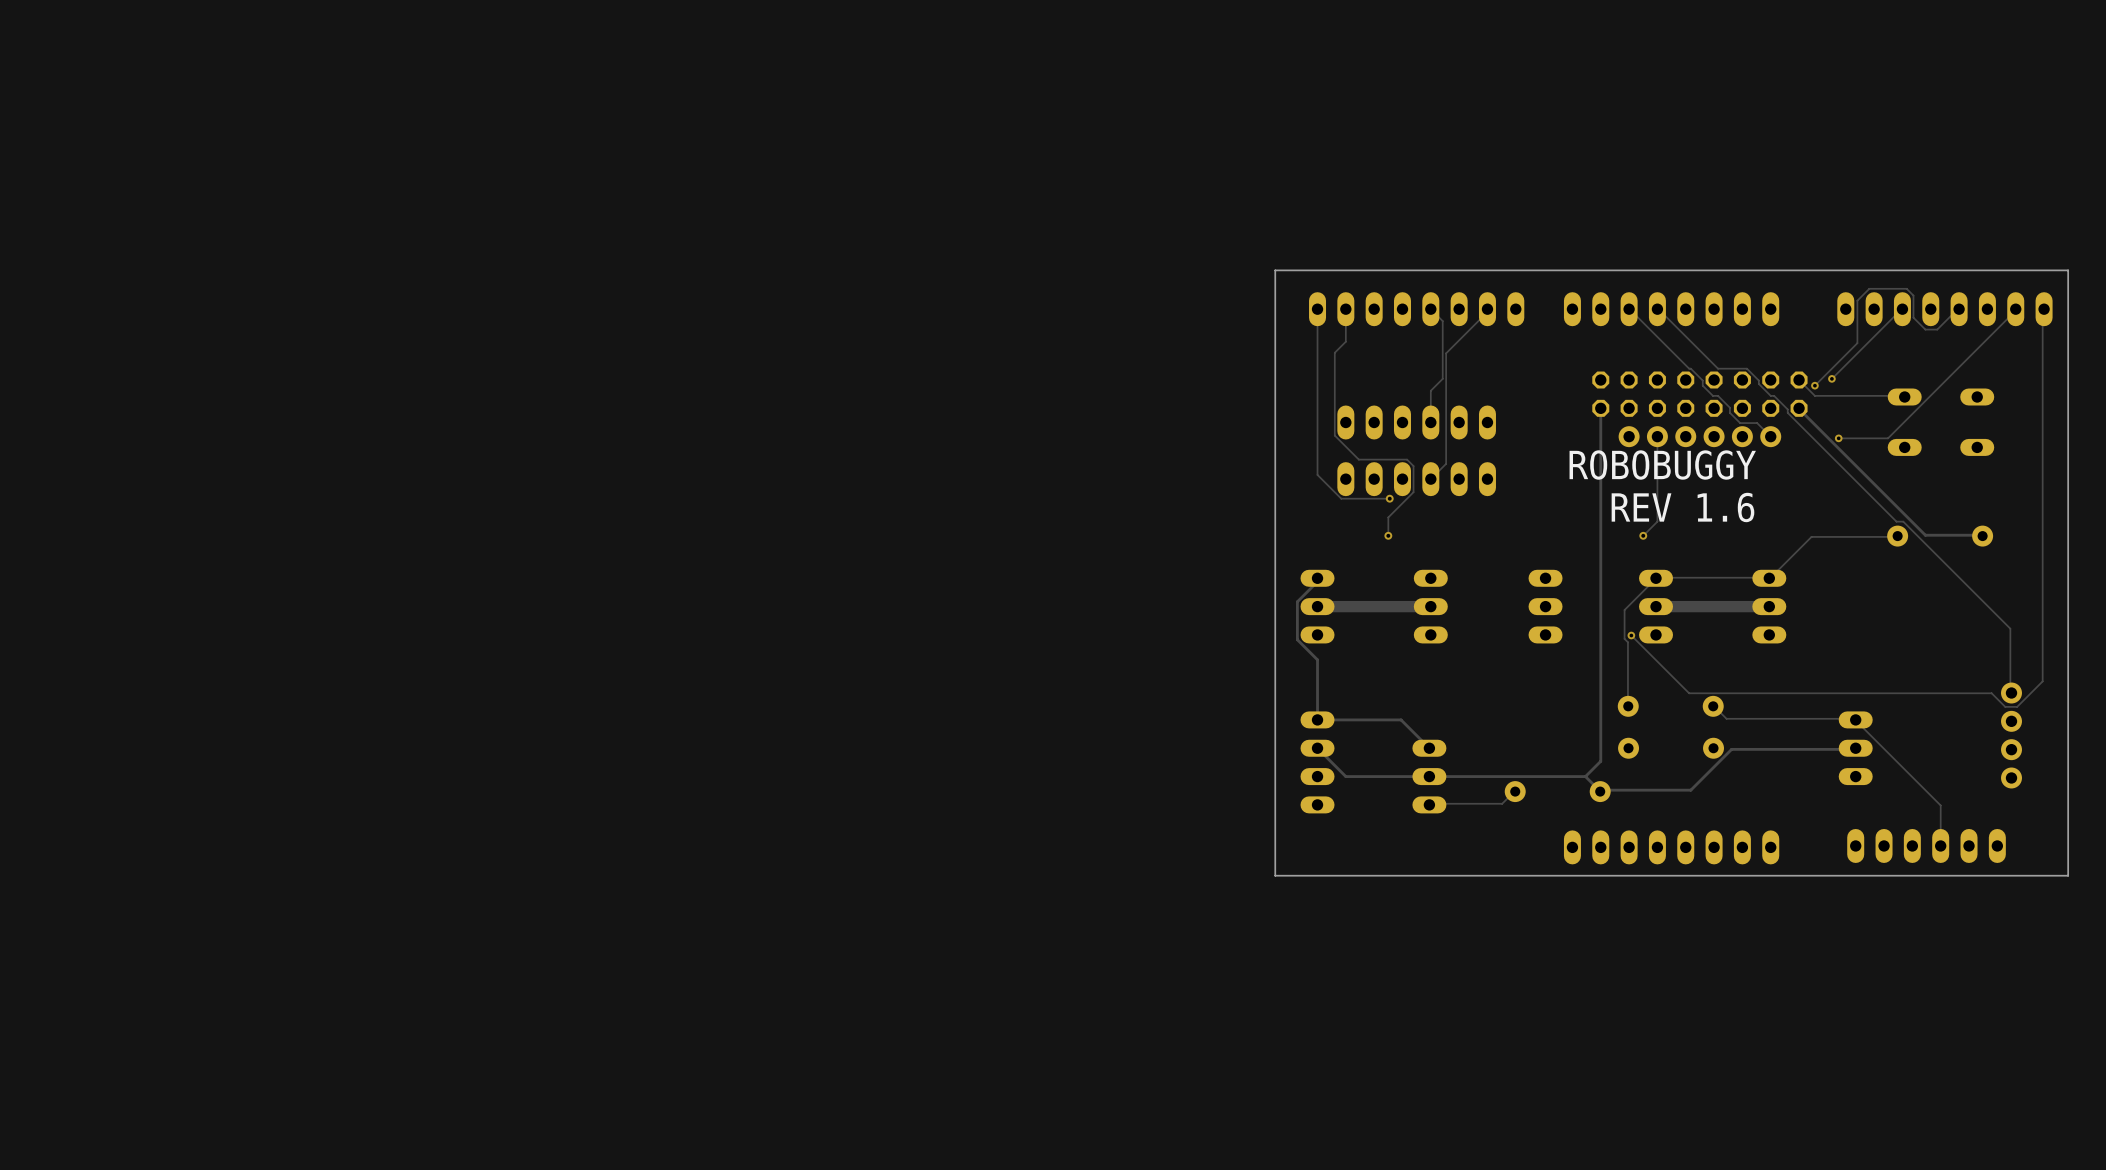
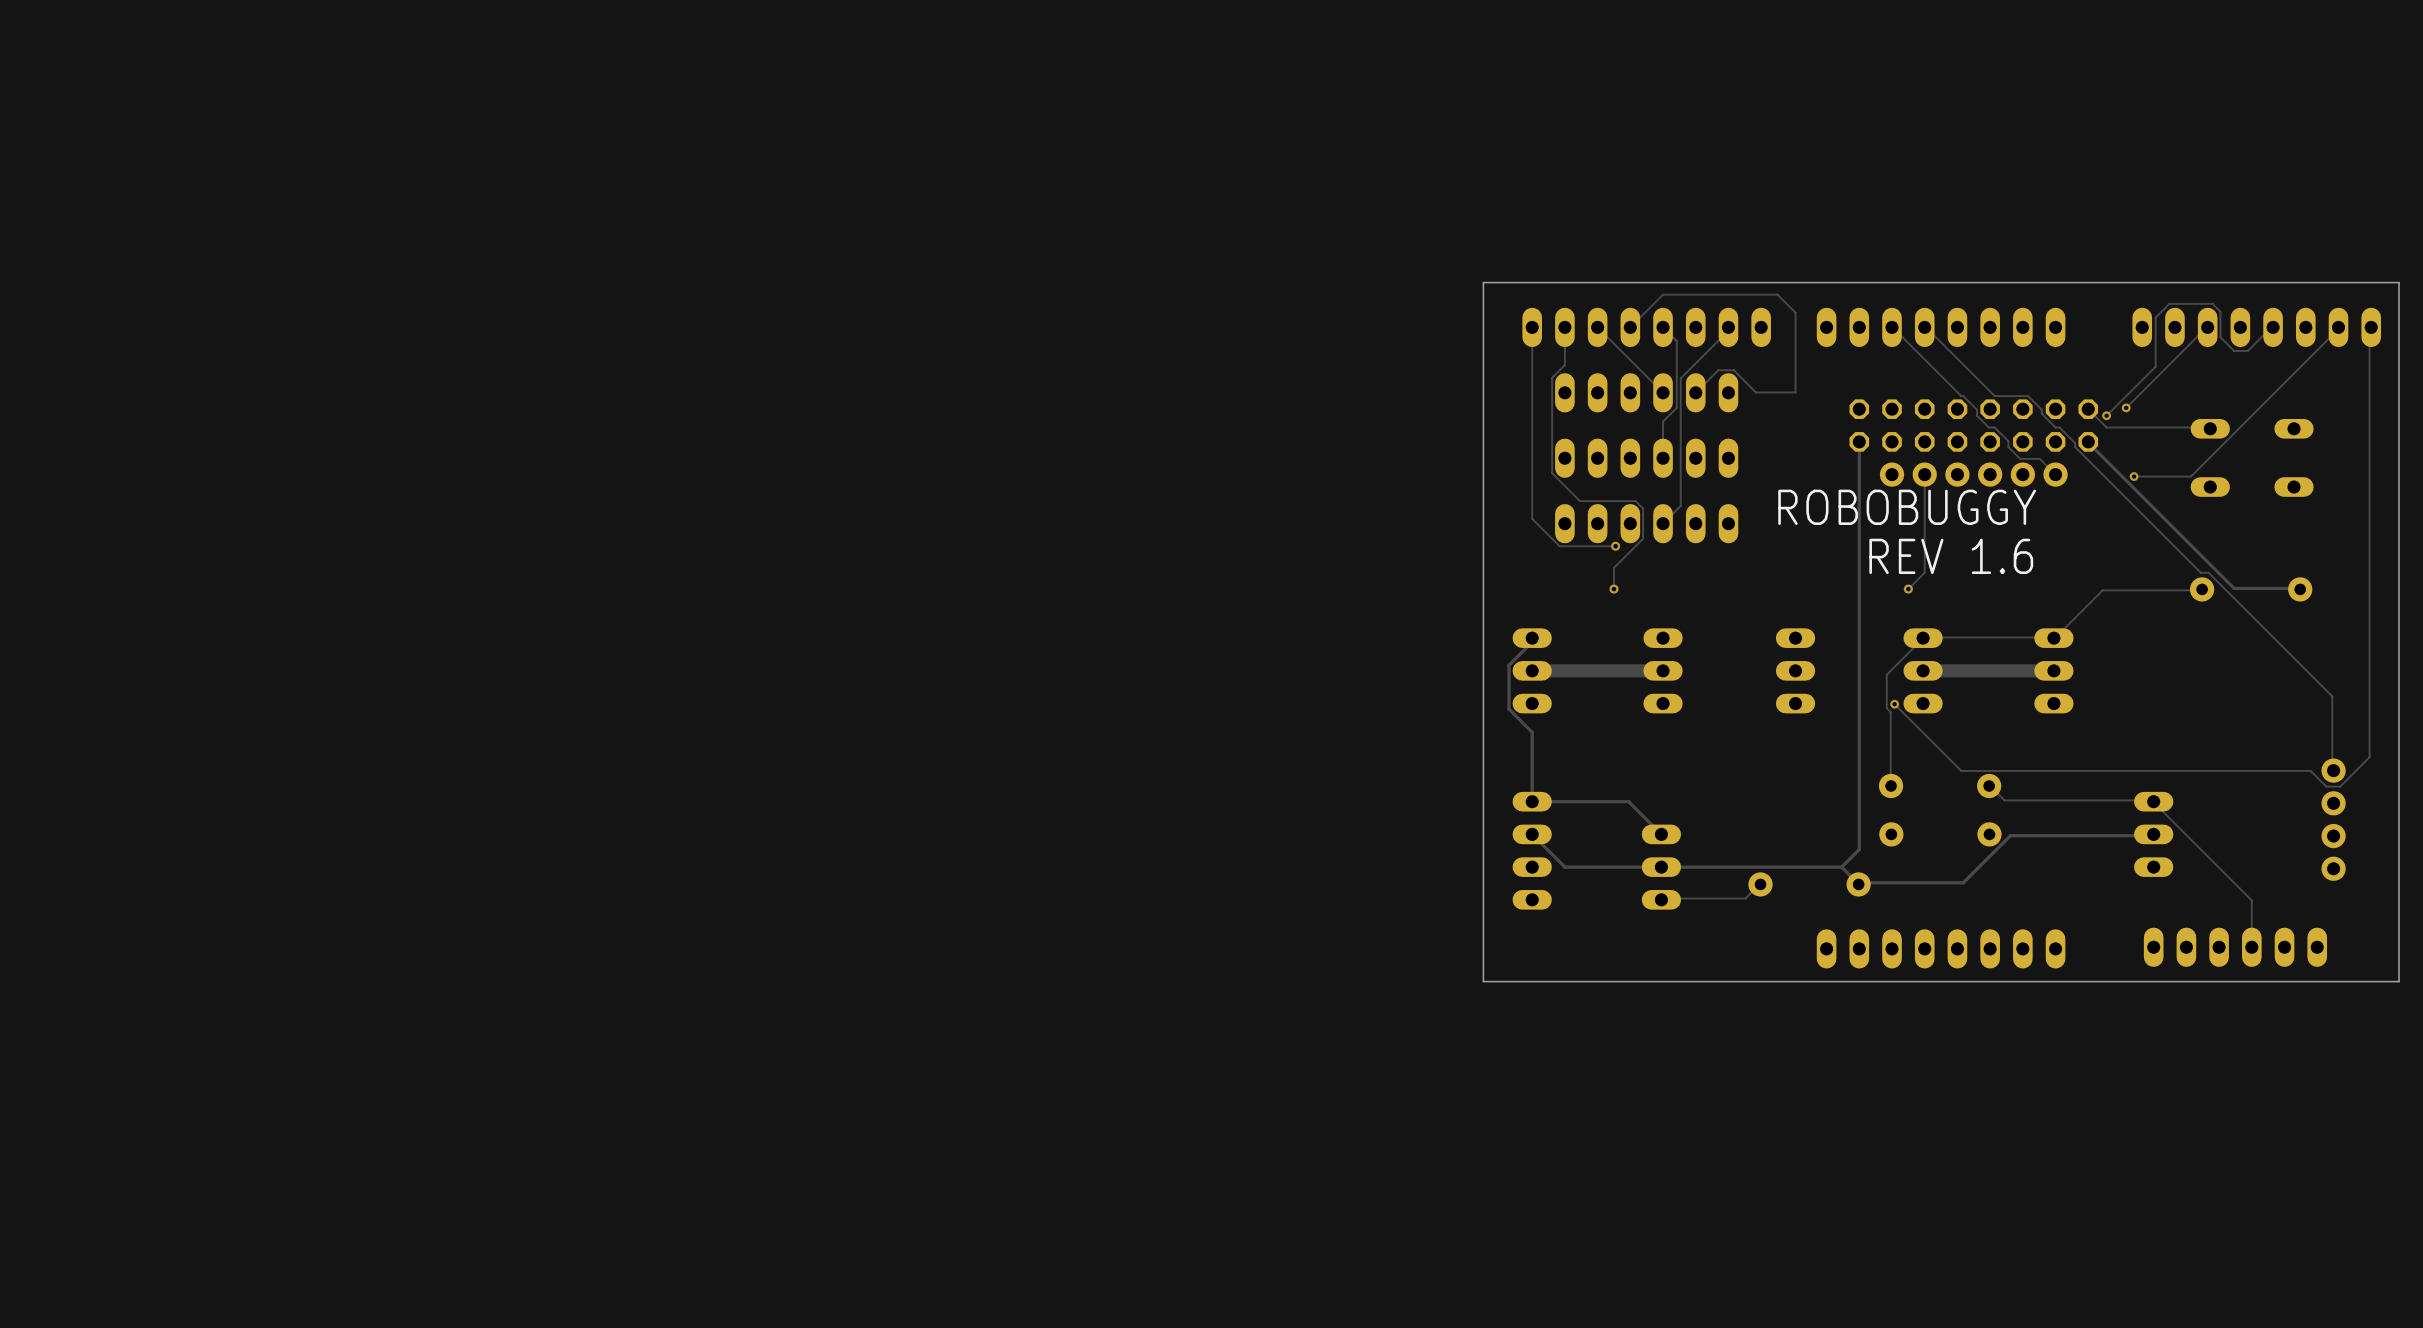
track: none -> (1597, 327) (1663, 392)
track: none -> (1630, 327) (1663, 294) (1777, 294) (1795, 312) (1795, 392) (1755, 392) (1733, 370) (1718, 370) (1695, 392)
part: none -> (1646, 392)

